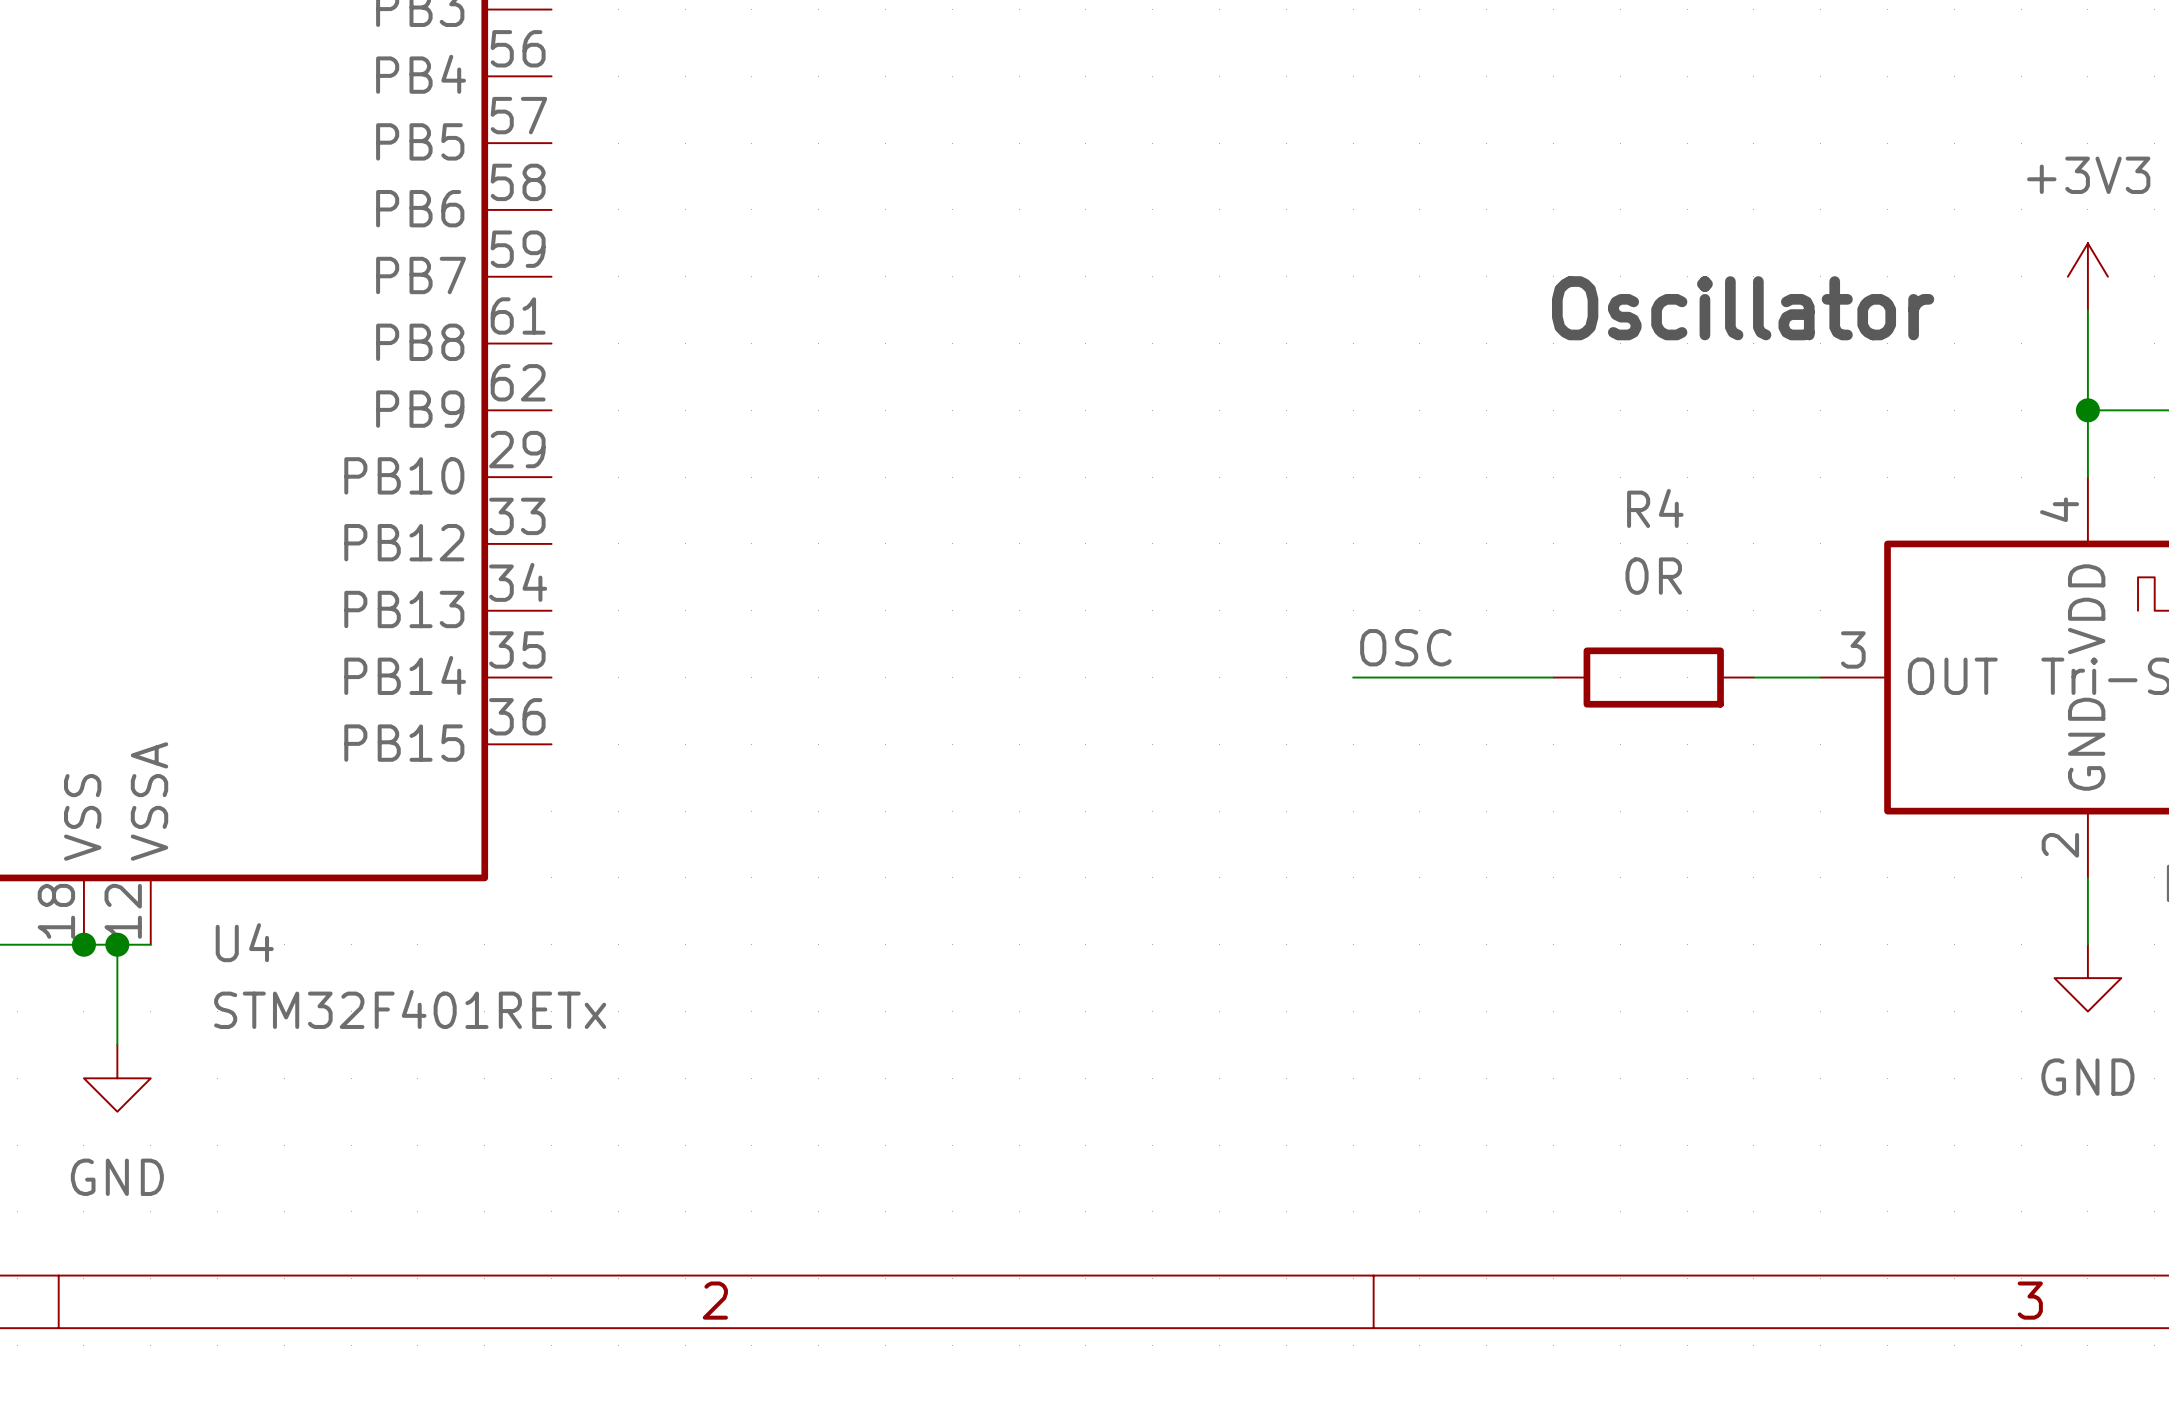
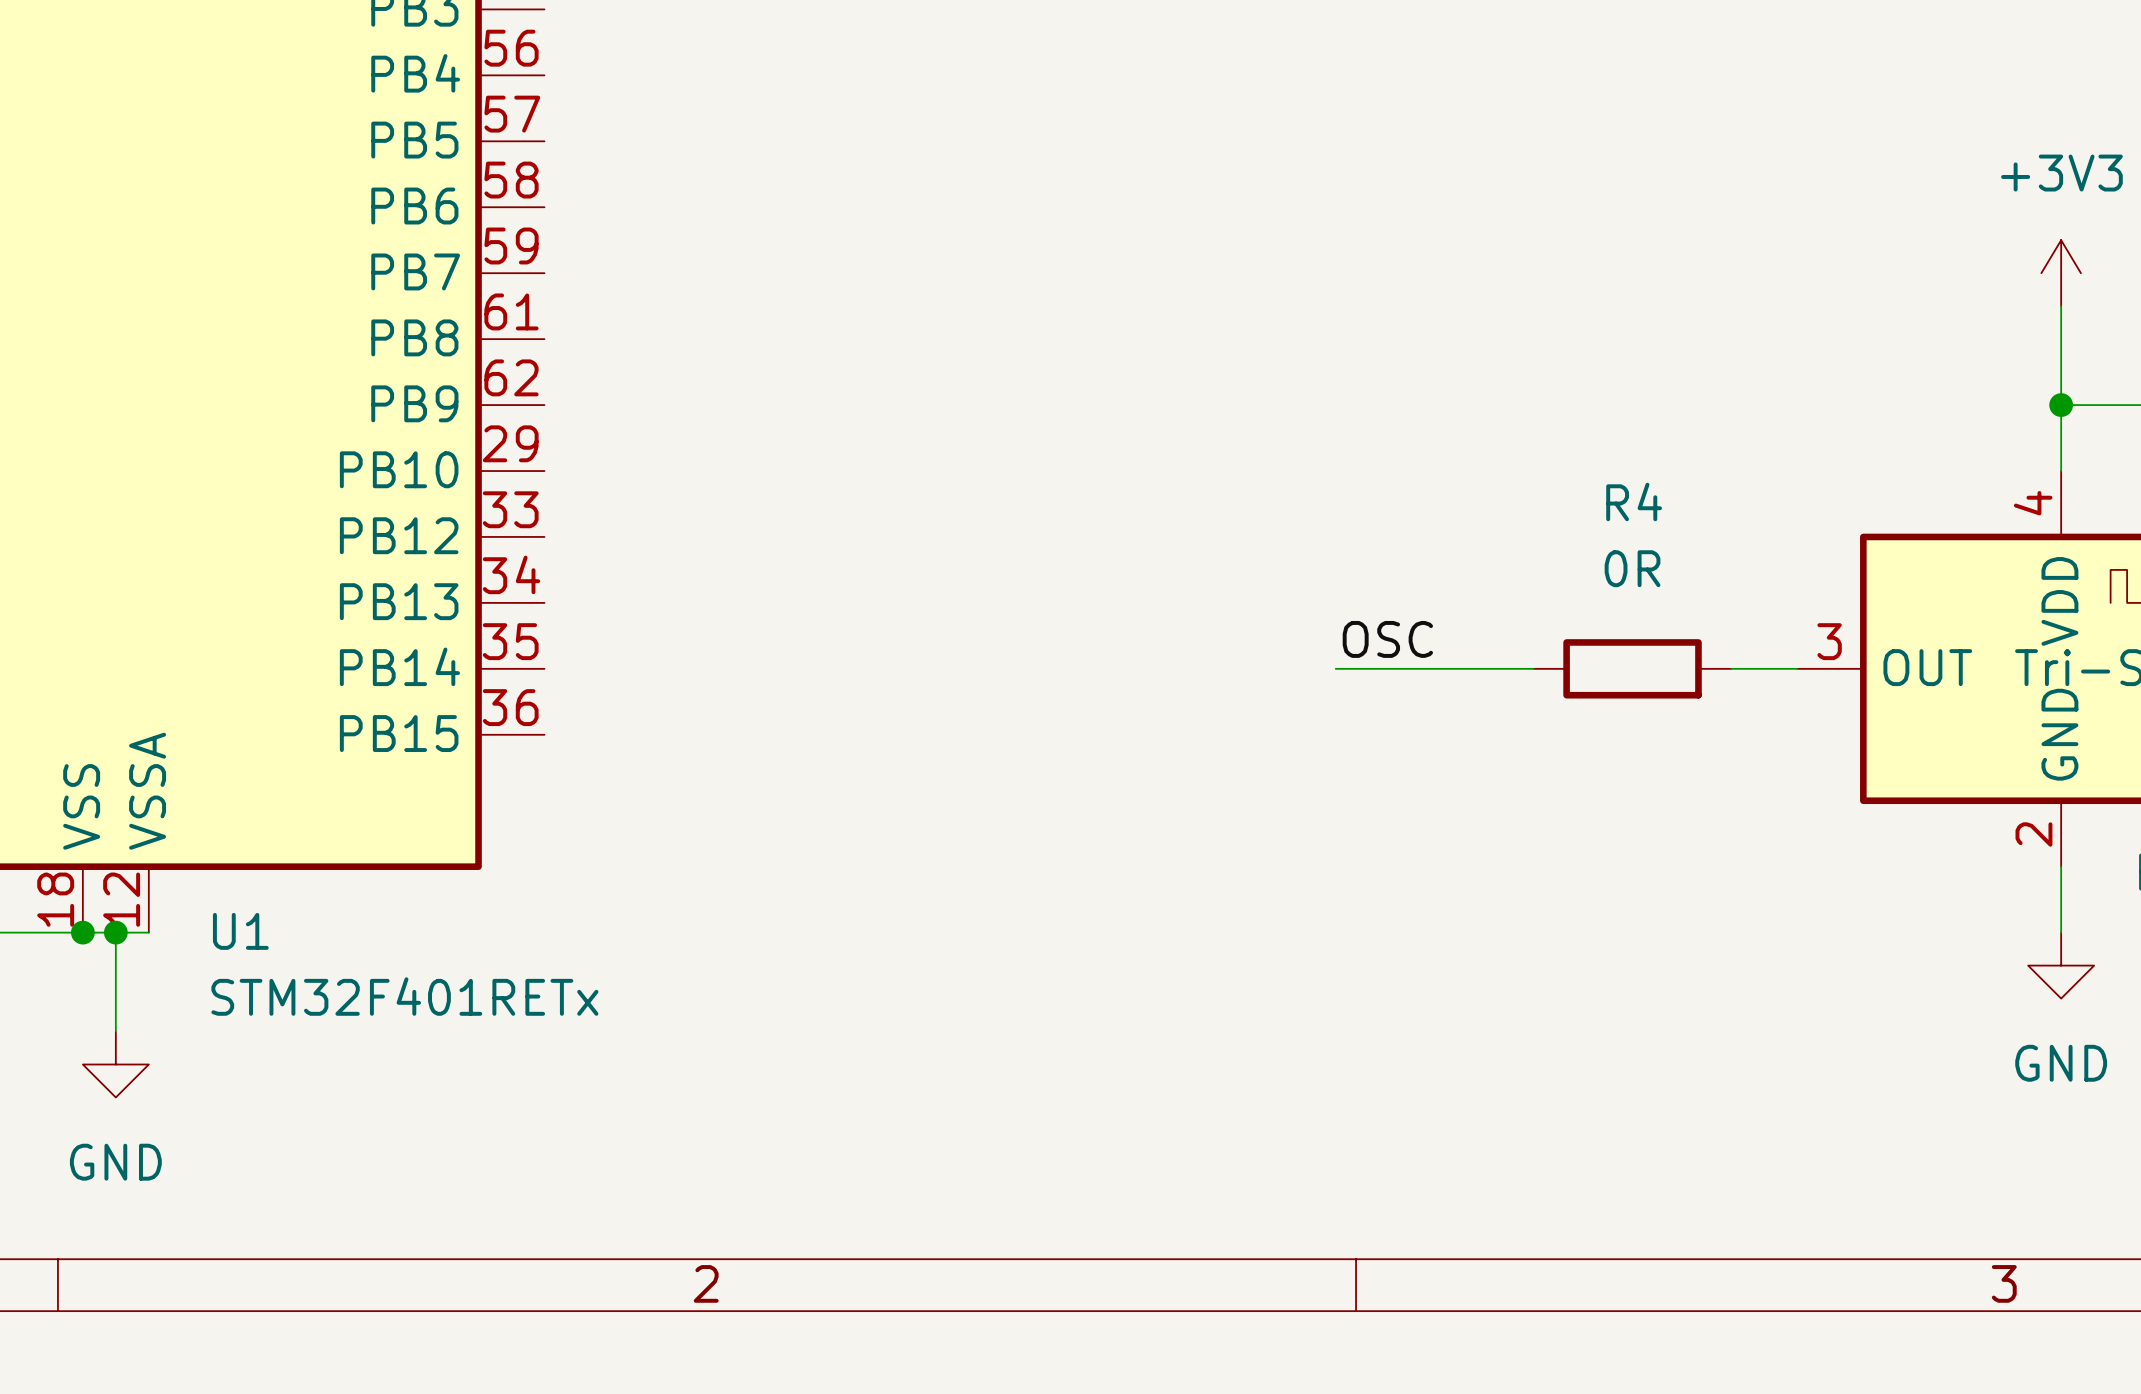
text: Oscillator (1743, 308) -> none
U4 name: U4 (244, 942) -> U1 (240, 931)

